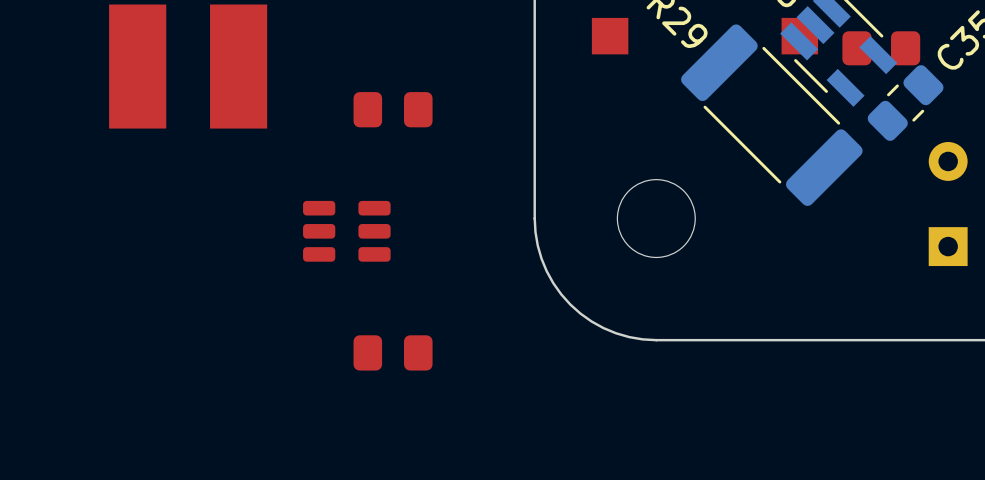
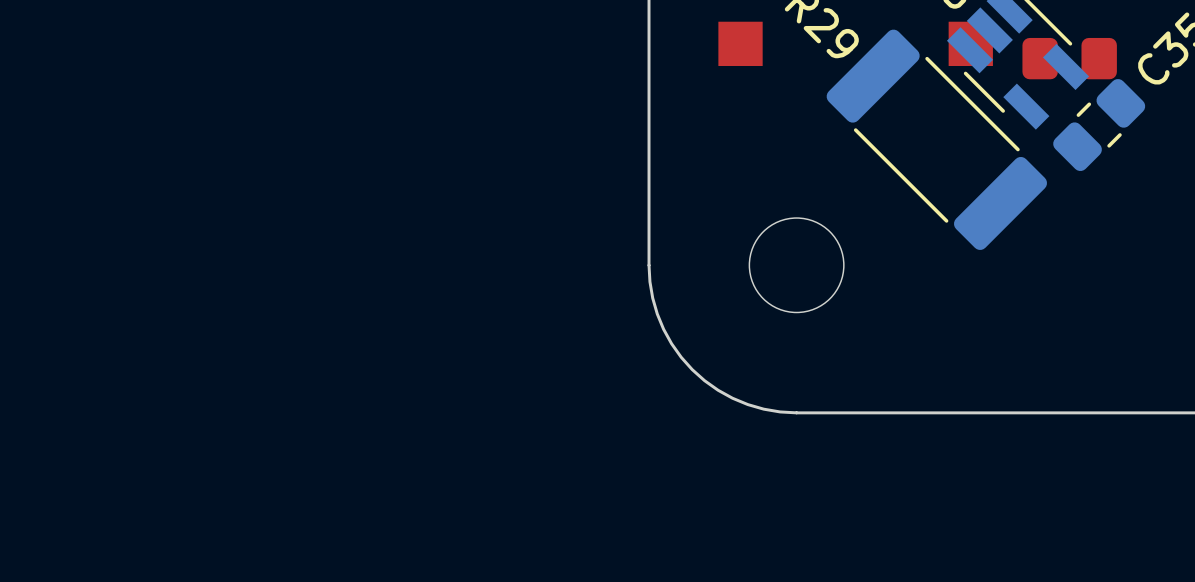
part: (188, 66) -> none
part: (393, 109) -> none
part: (948, 204) -> none
part: (346, 231) -> none
part: (393, 352) -> none

